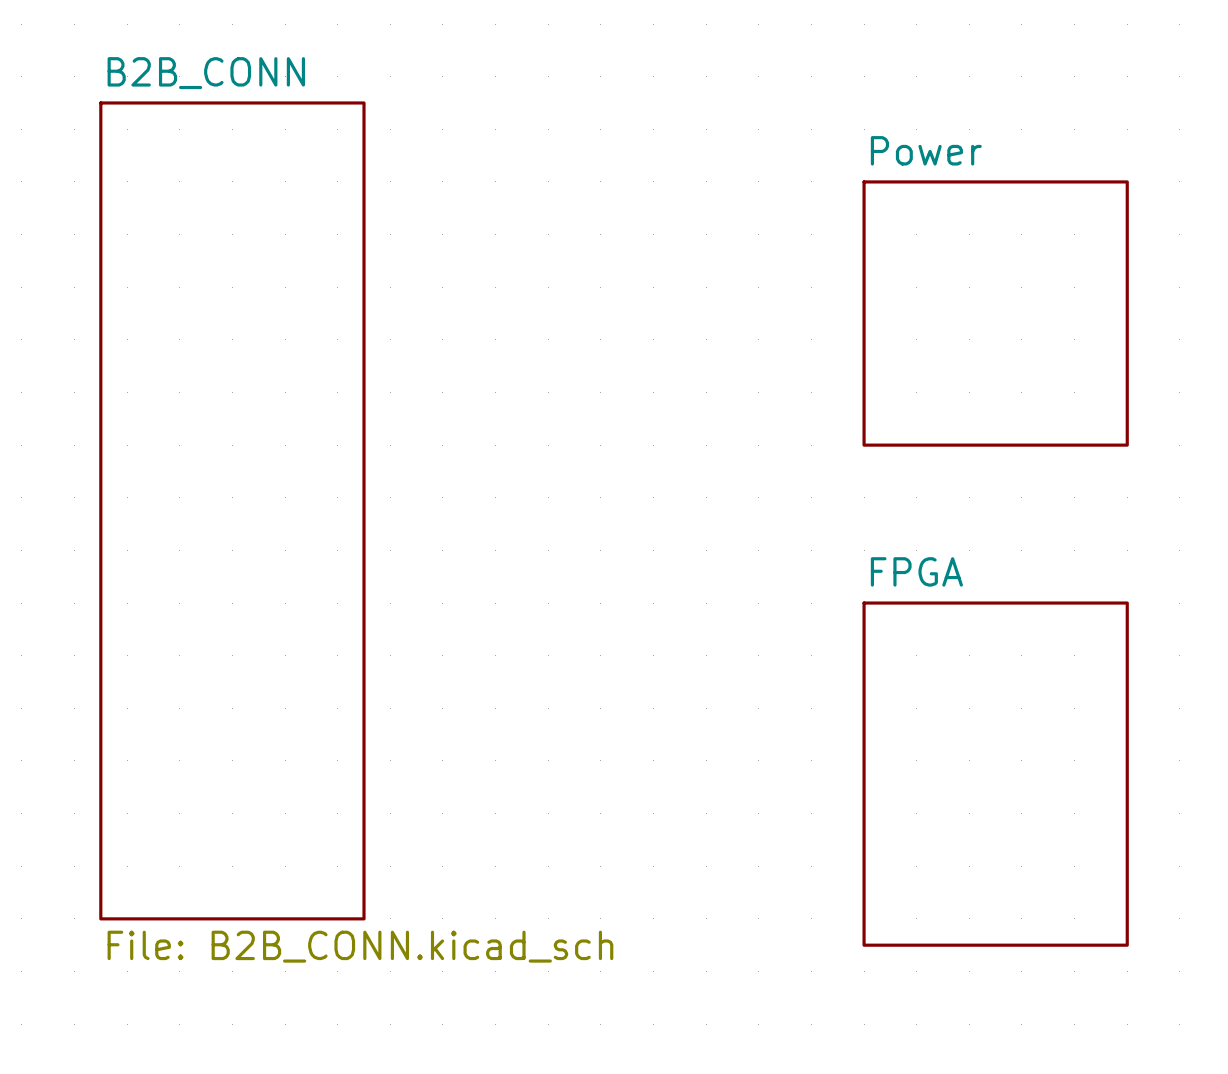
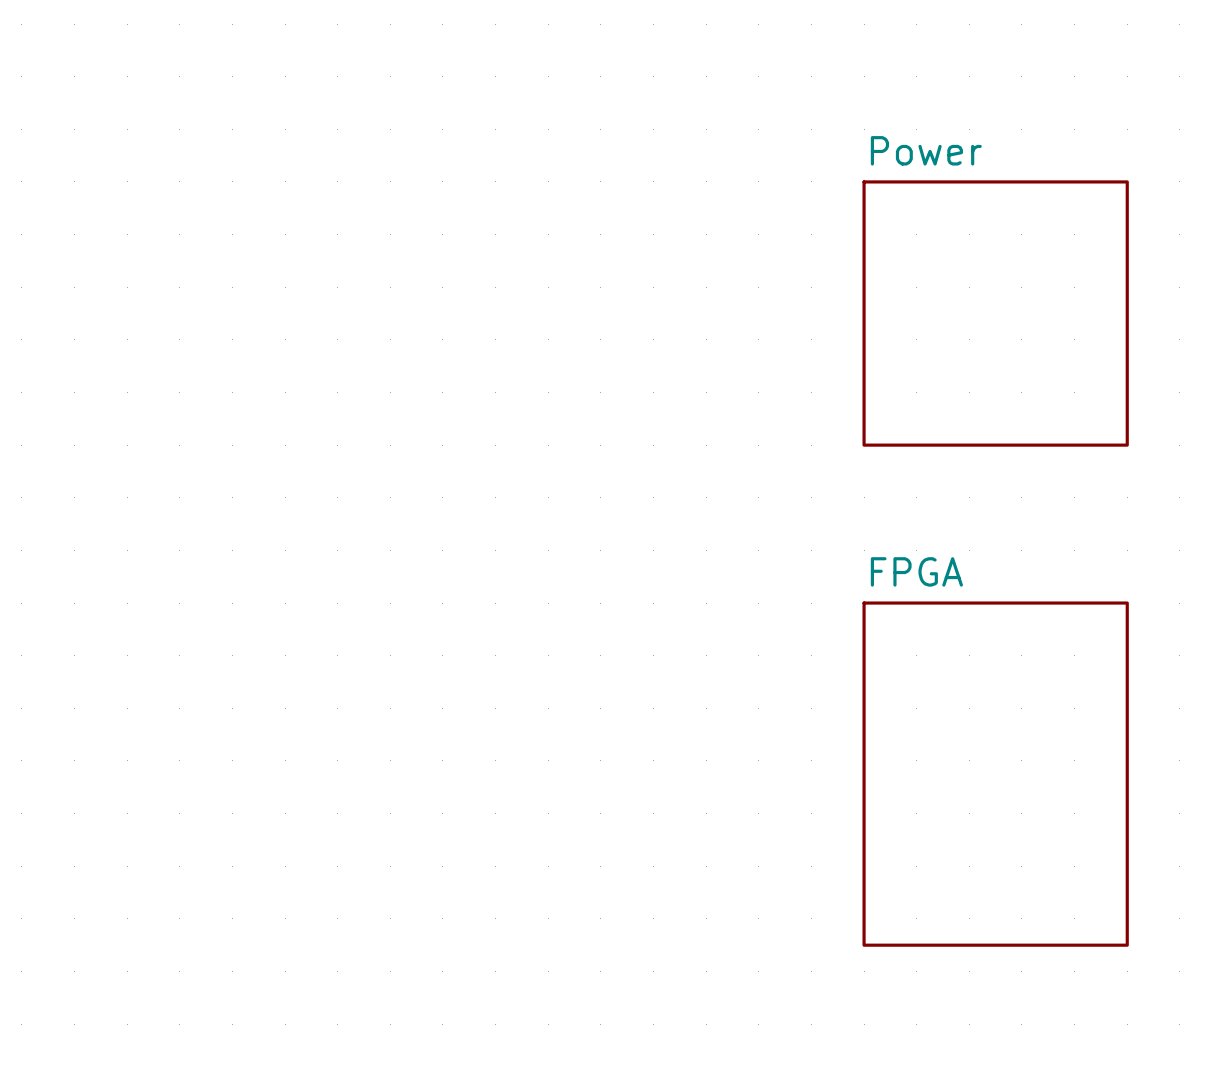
sheet B2B_CONN: File: B2B_CONN.kicad_sch (232, 510) -> none

